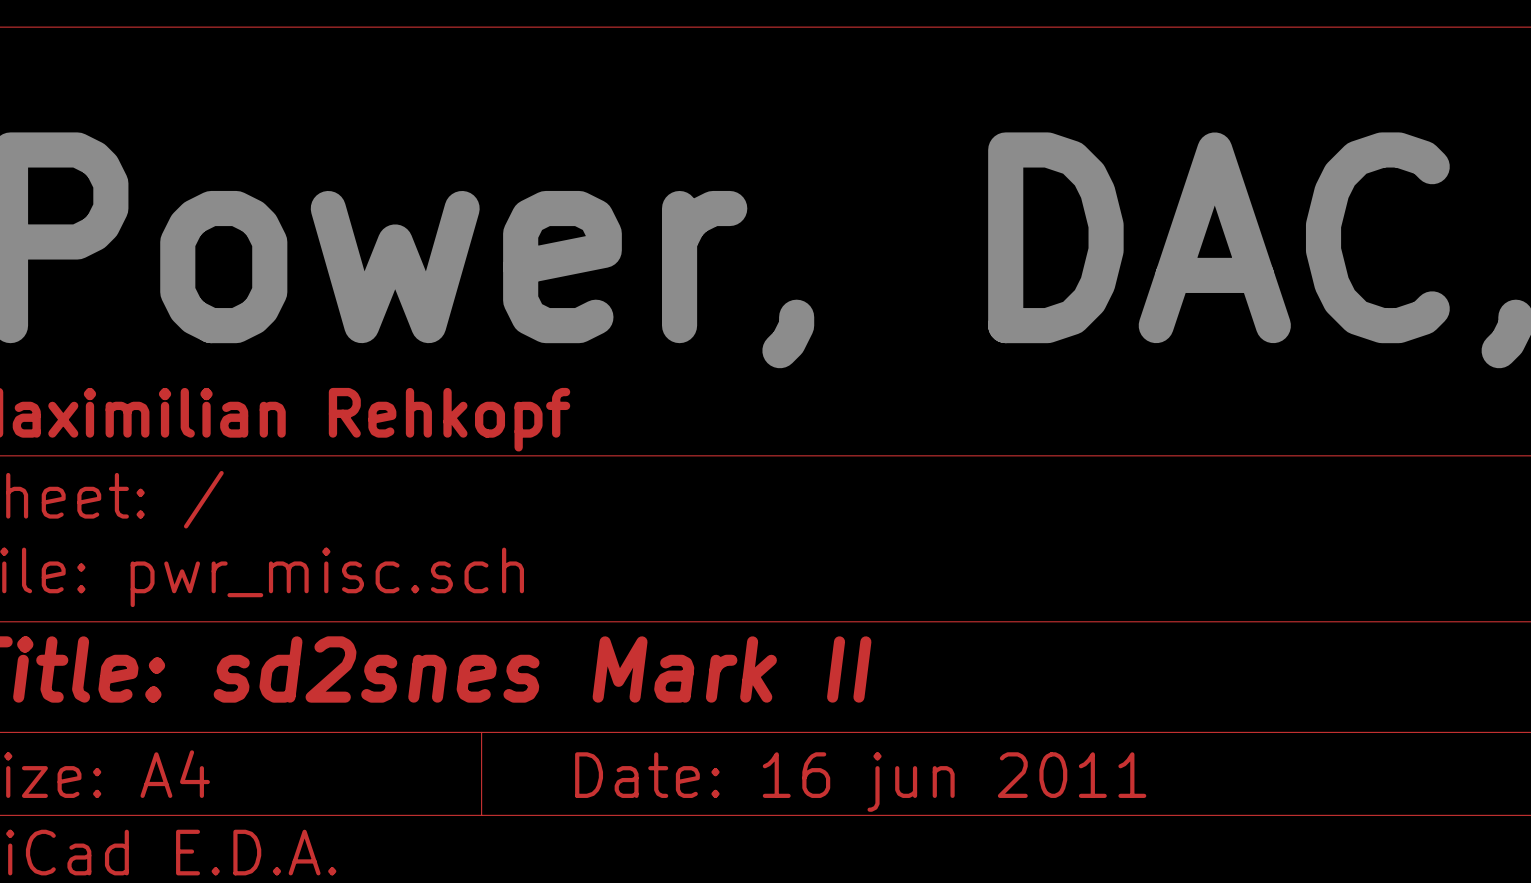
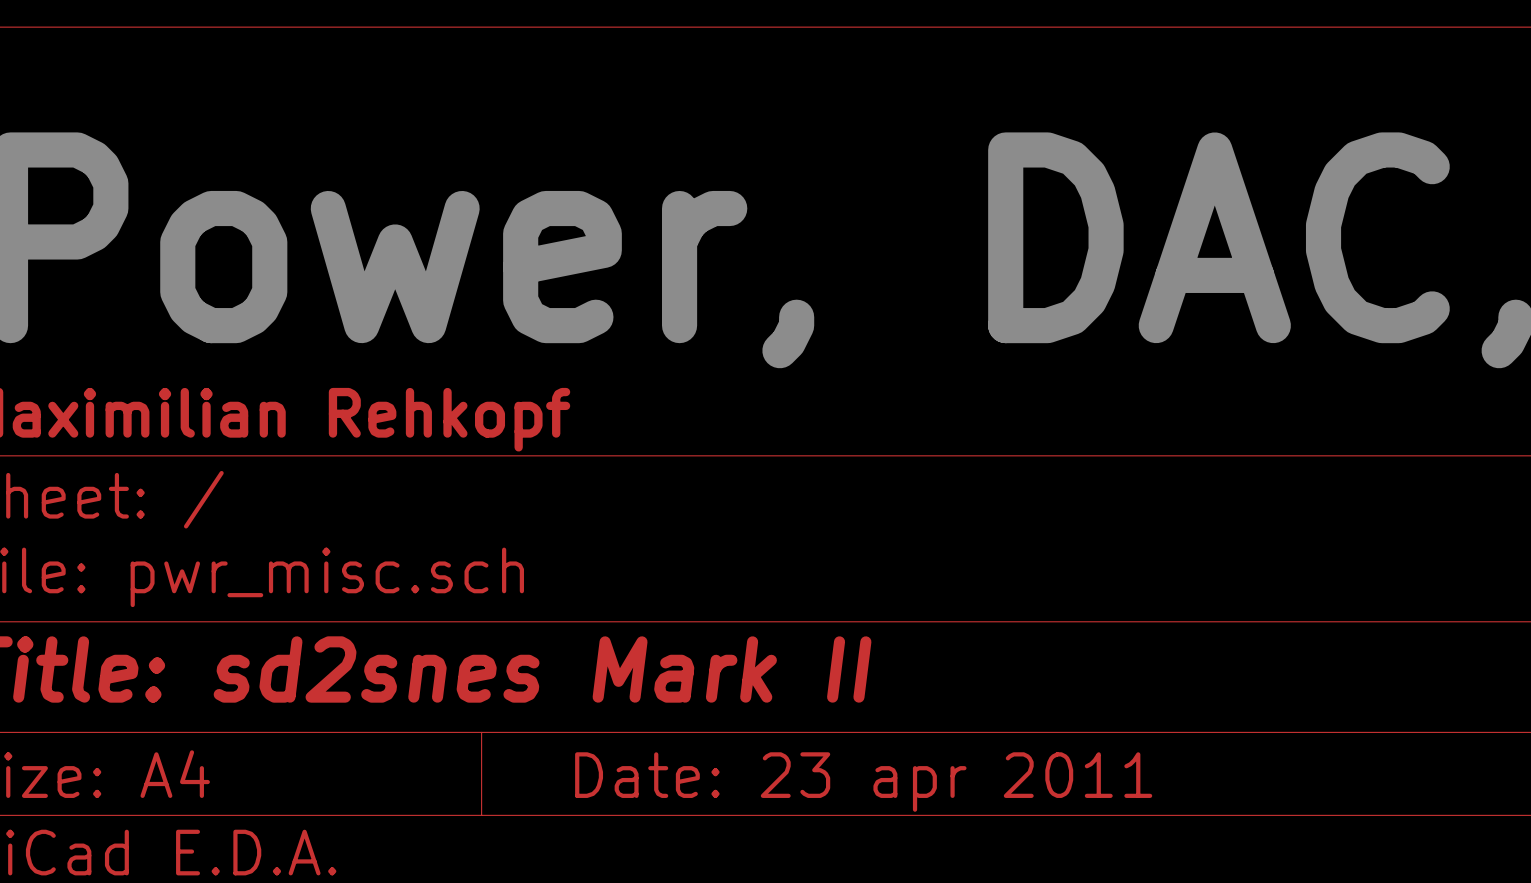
title block: Date: 16 jun 2011 (860, 782) -> Date: 23 apr 2011 (863, 782)

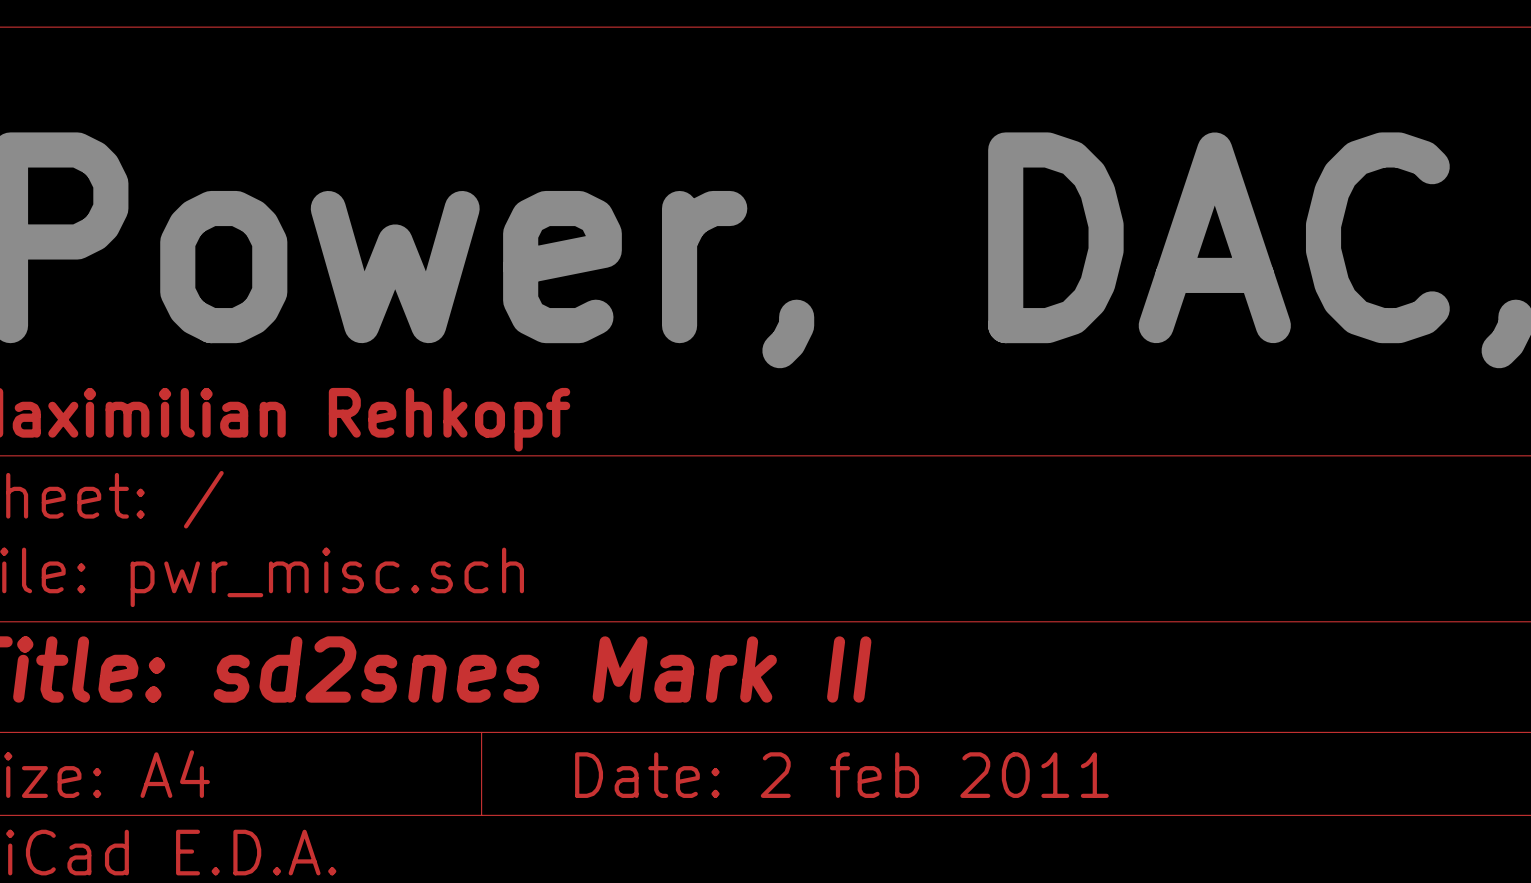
title block: Date: 23 apr 2011 (863, 782) -> Date: 2 feb 2011 (841, 775)

